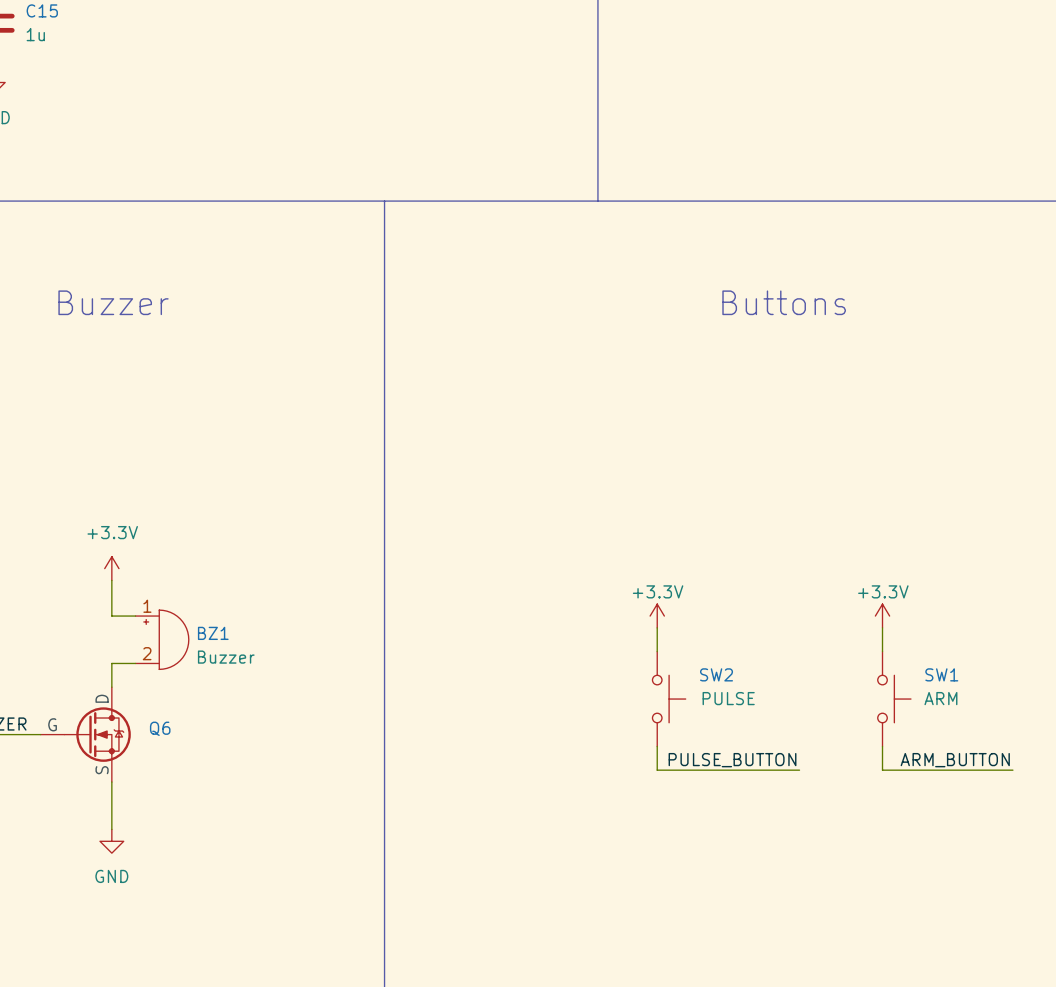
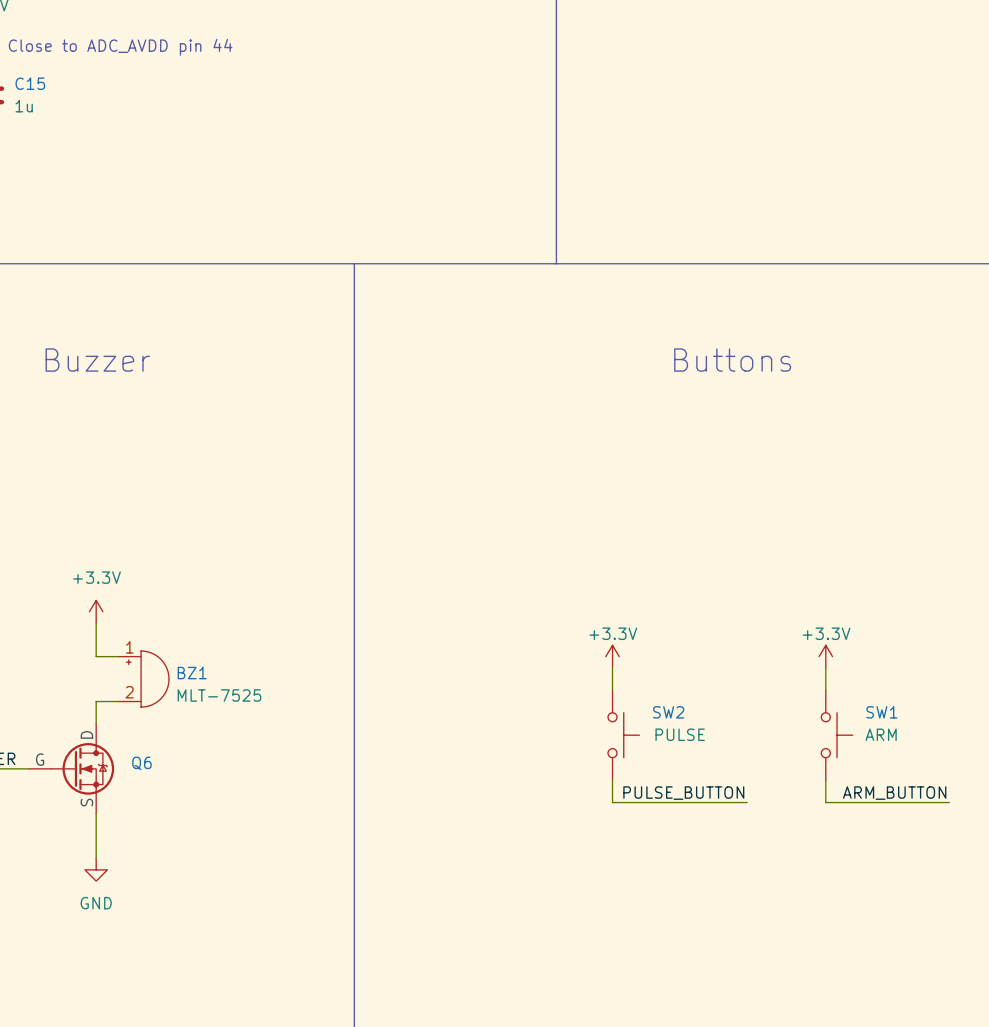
BZ1 value: Buzzer (226, 657) -> MLT-7525 (219, 695)

